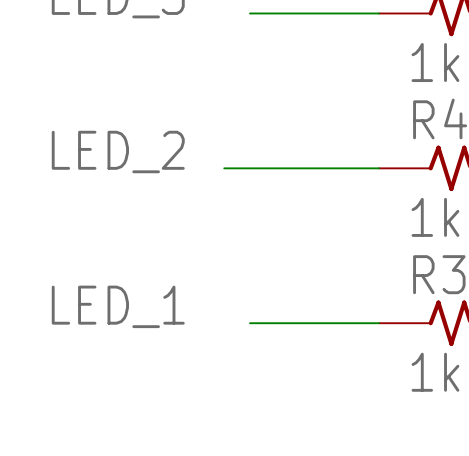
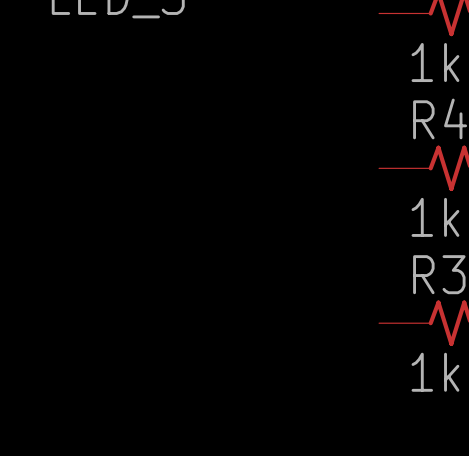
wire: (250, 13) (379, 13) -> none
label: LED_2 (118, 151) -> none
wire: (224, 168) (379, 168) -> none
label: LED_1 (118, 306) -> none
wire: (250, 323) (379, 323) -> none

